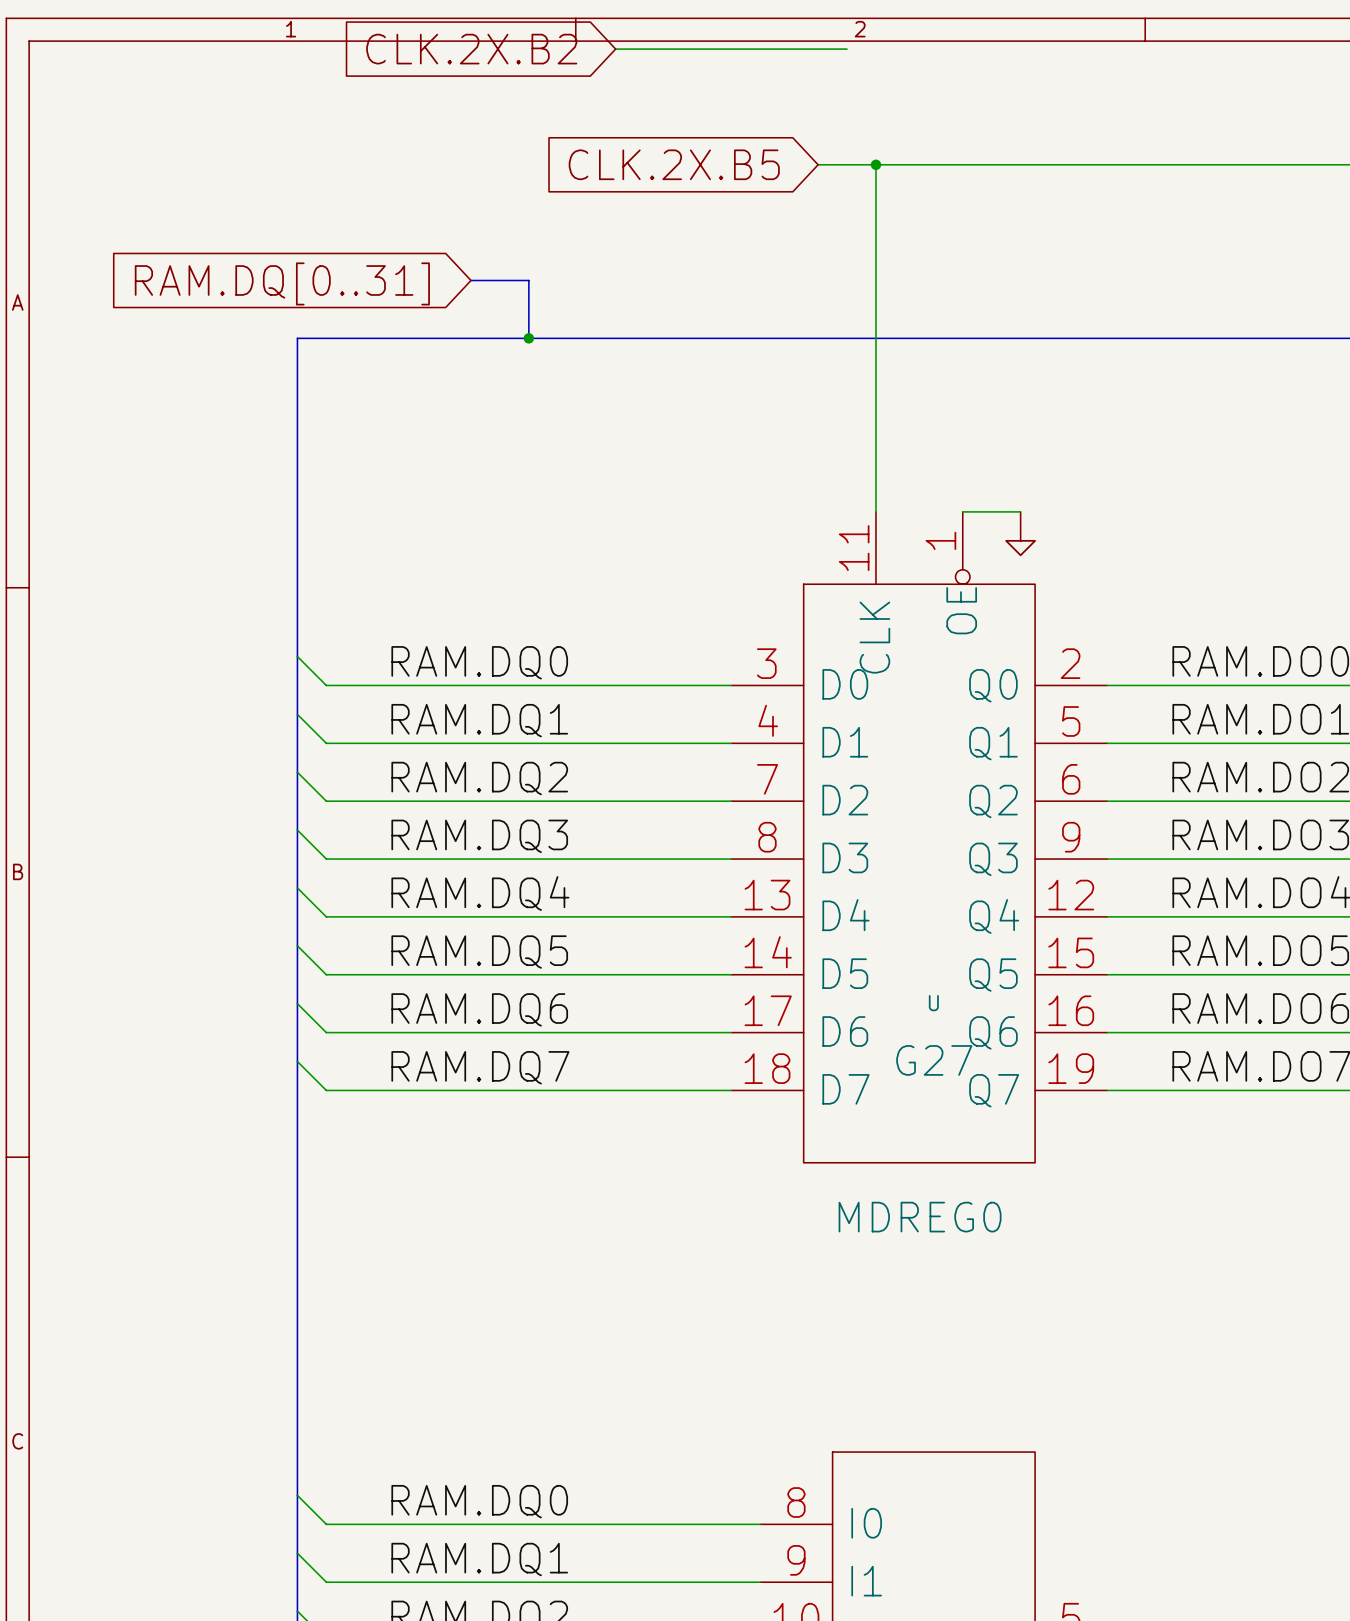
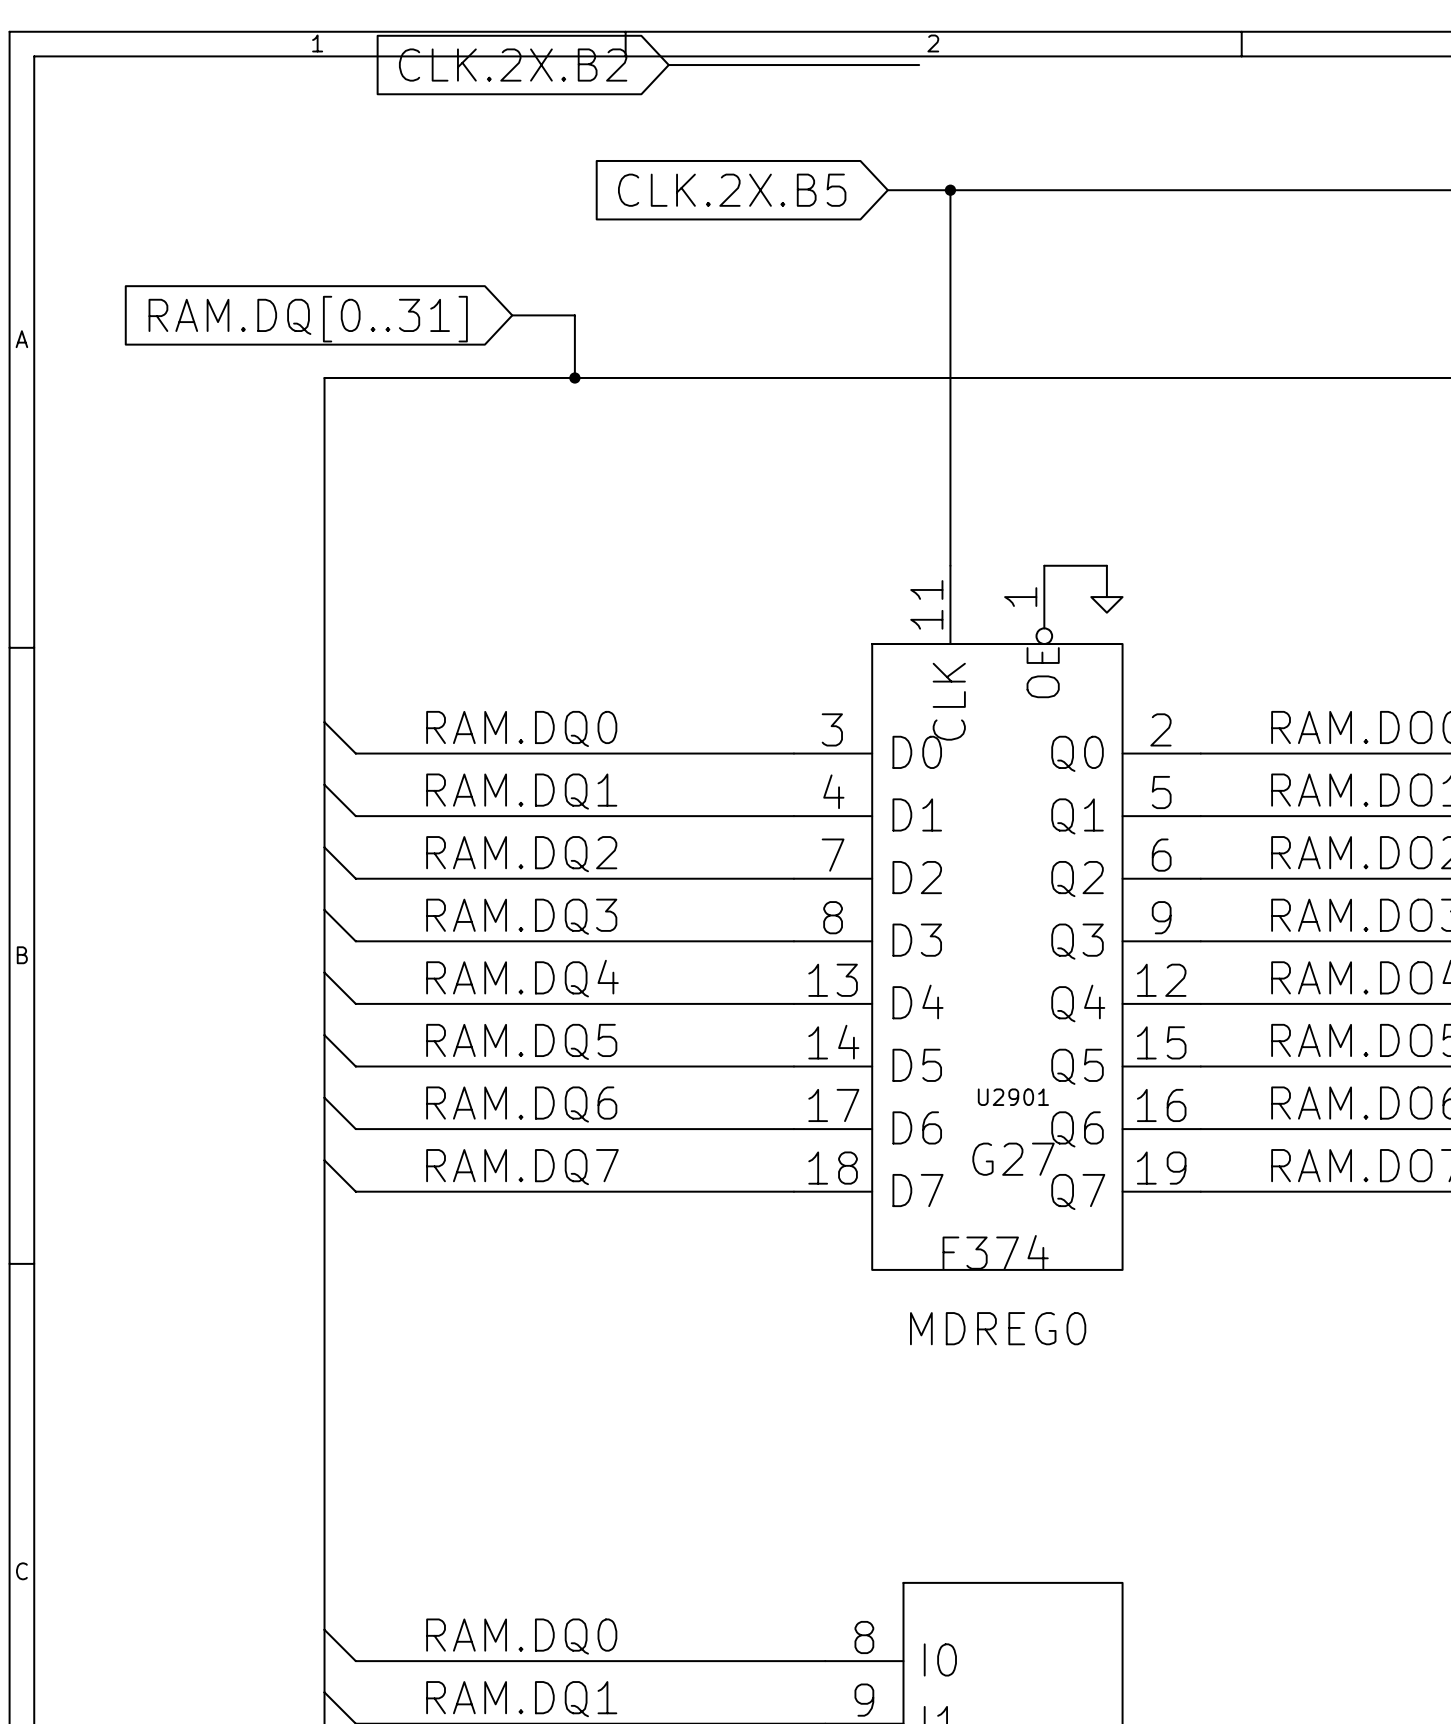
U name: U (933, 1003) -> U2901 (1013, 1097)
U value: none -> F374 (995, 1252)

